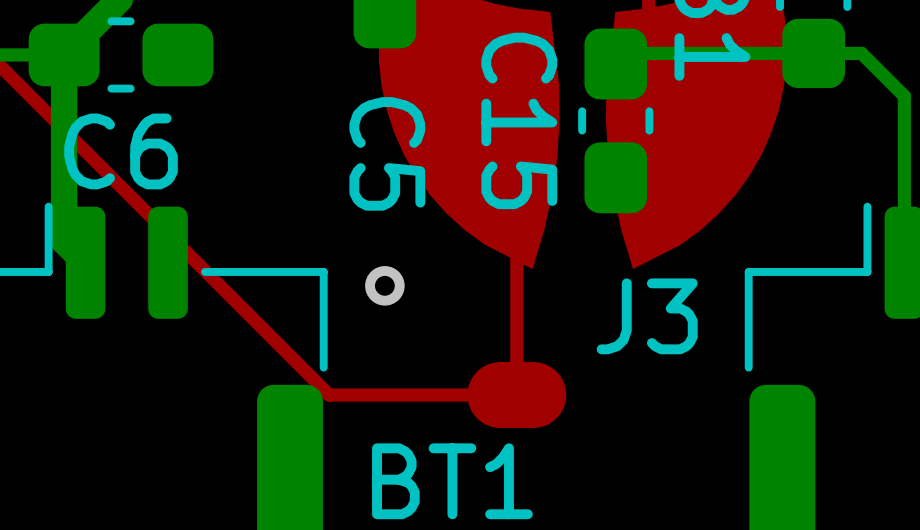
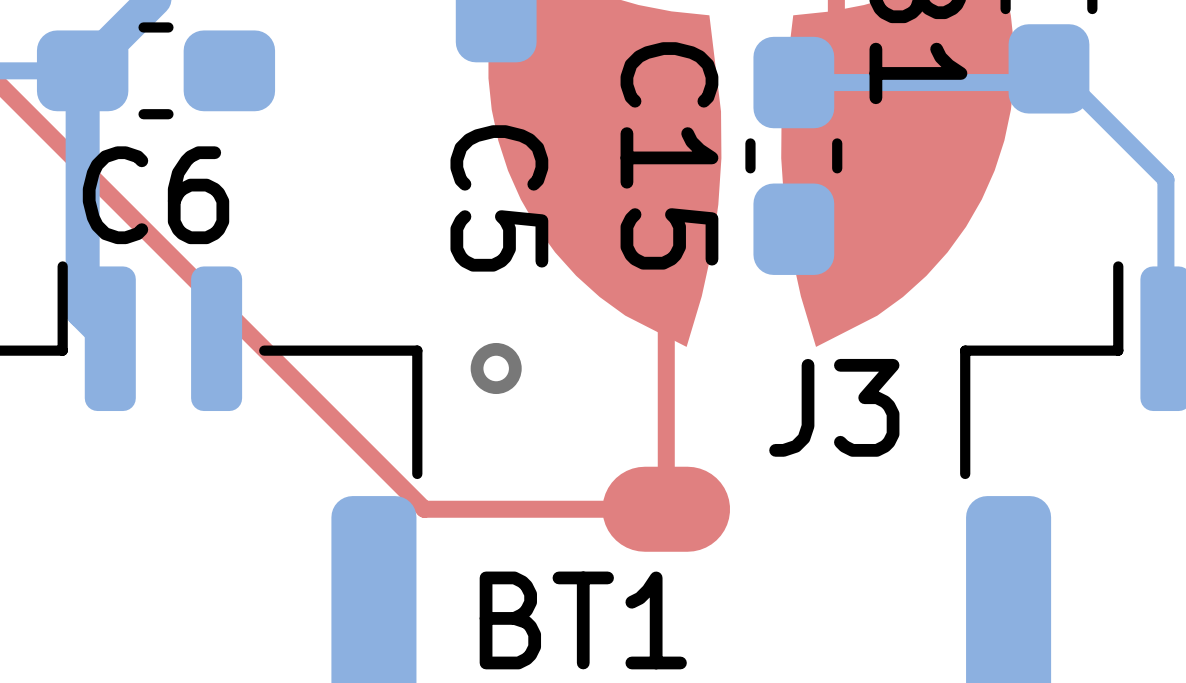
bottom track: (615, 64) (626, 53) (861, 53) (904, 96) (904, 139) -> (793, 82) (1041, 82) (1055, 68) (1165, 179)

